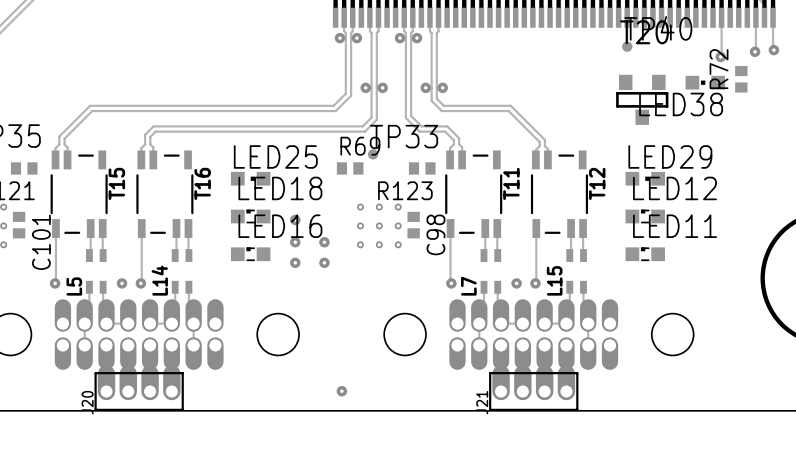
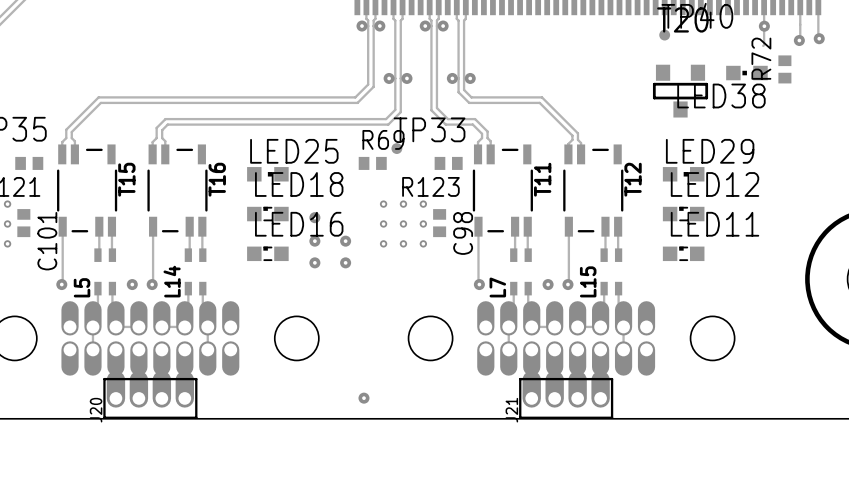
via position: (720, 56) -> (764, 26)

